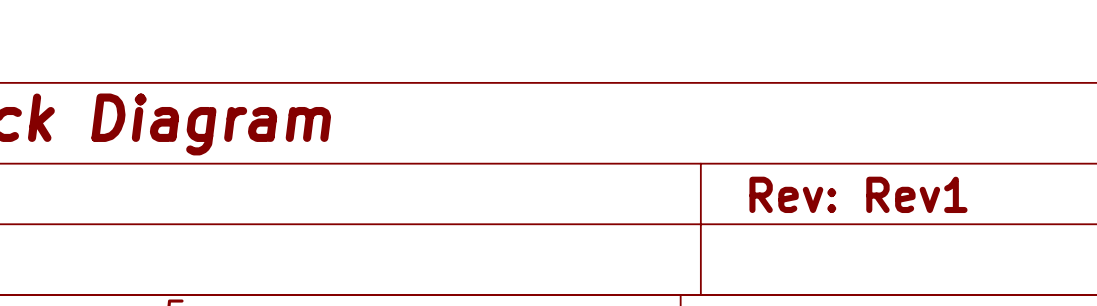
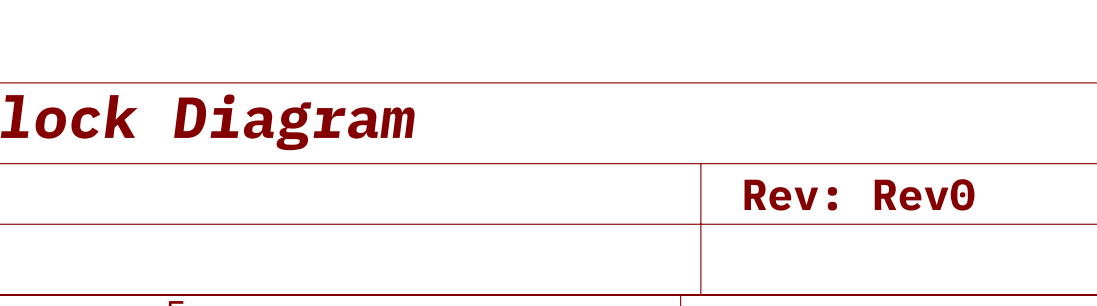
title block: Rev: Rev1 (858, 194) -> Rev: Rev0 (859, 194)

